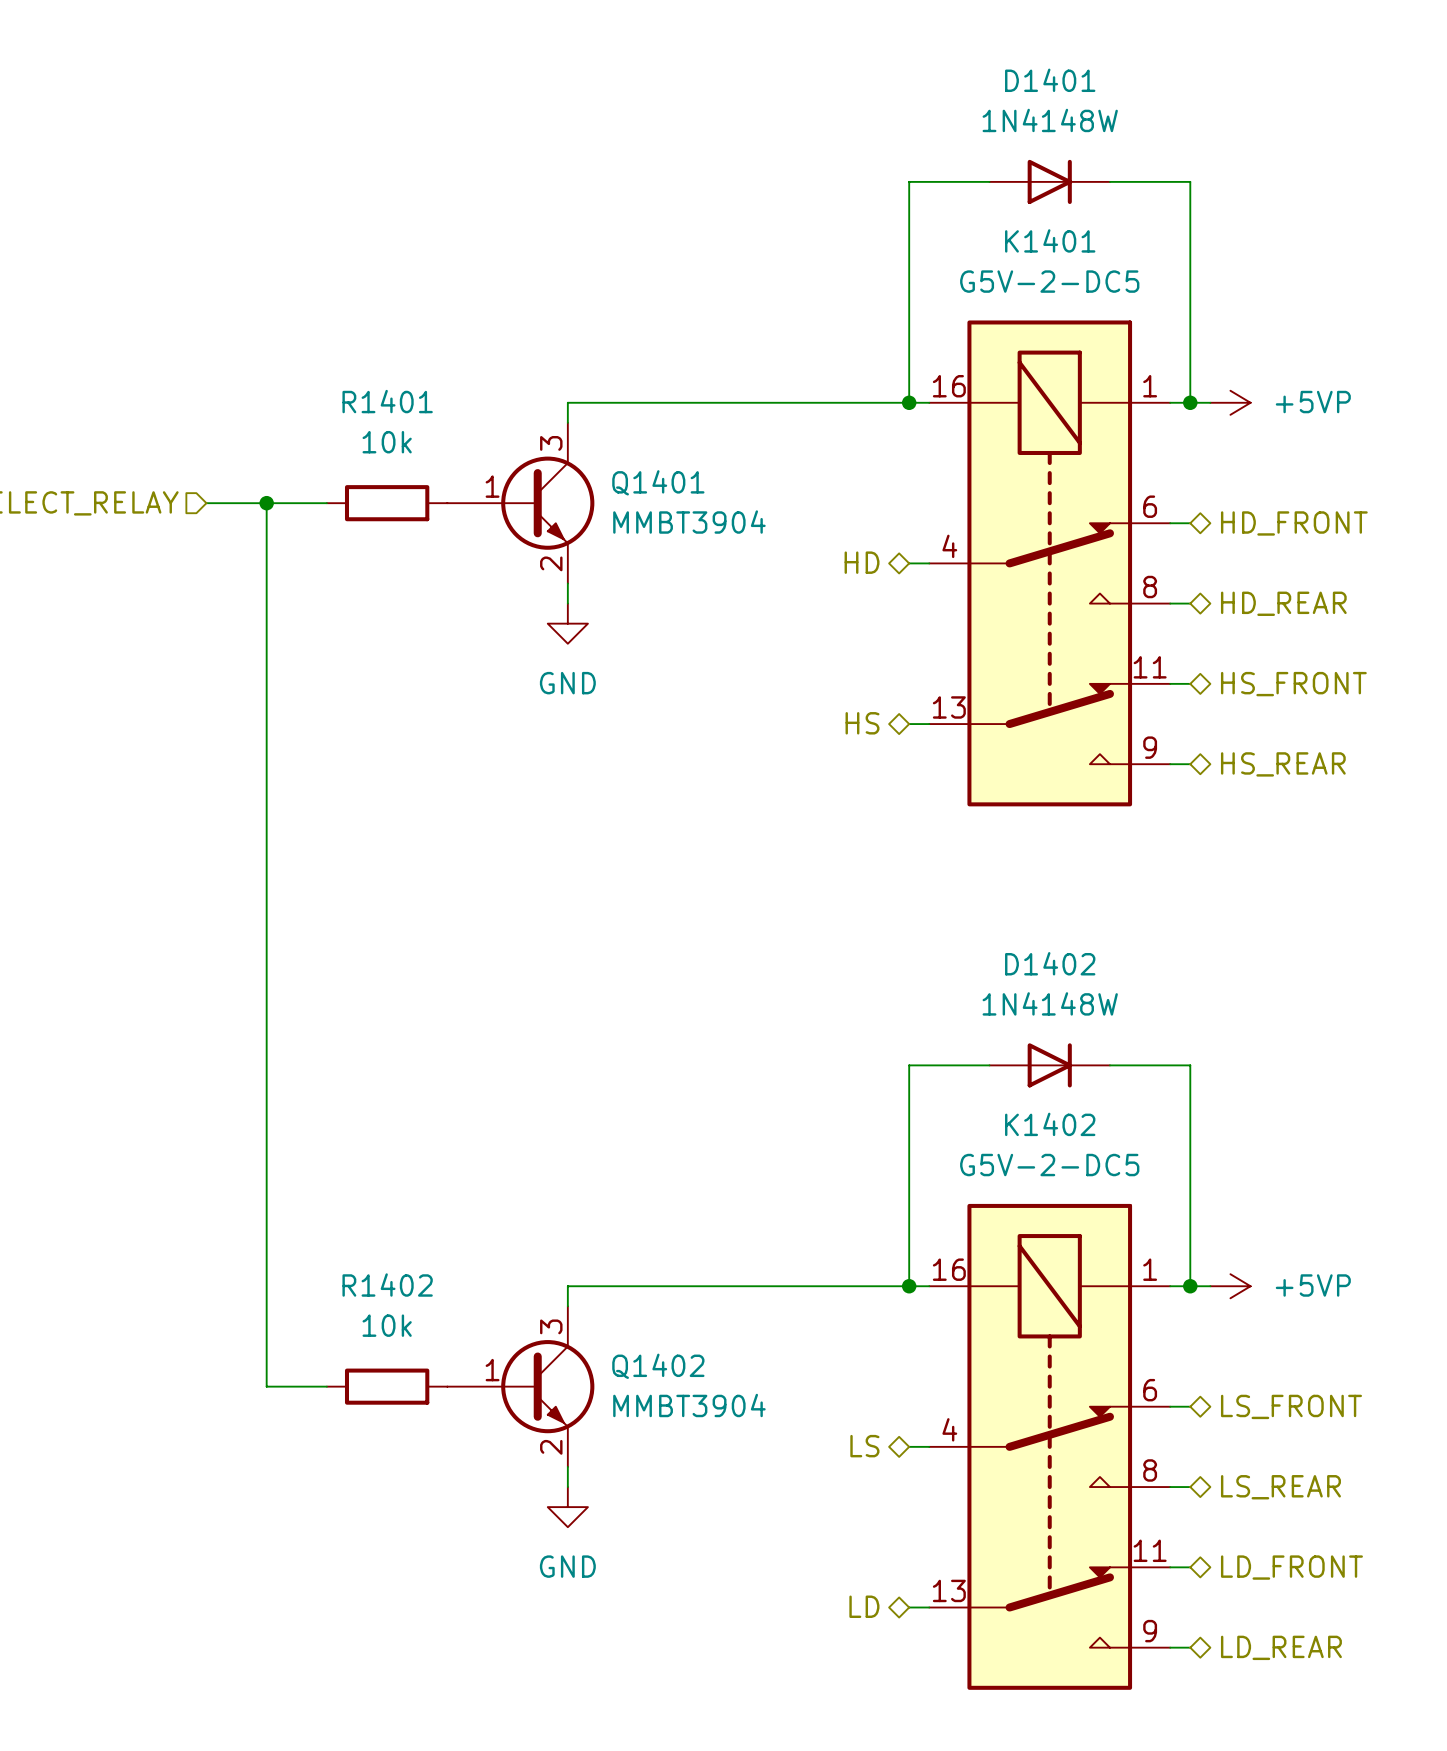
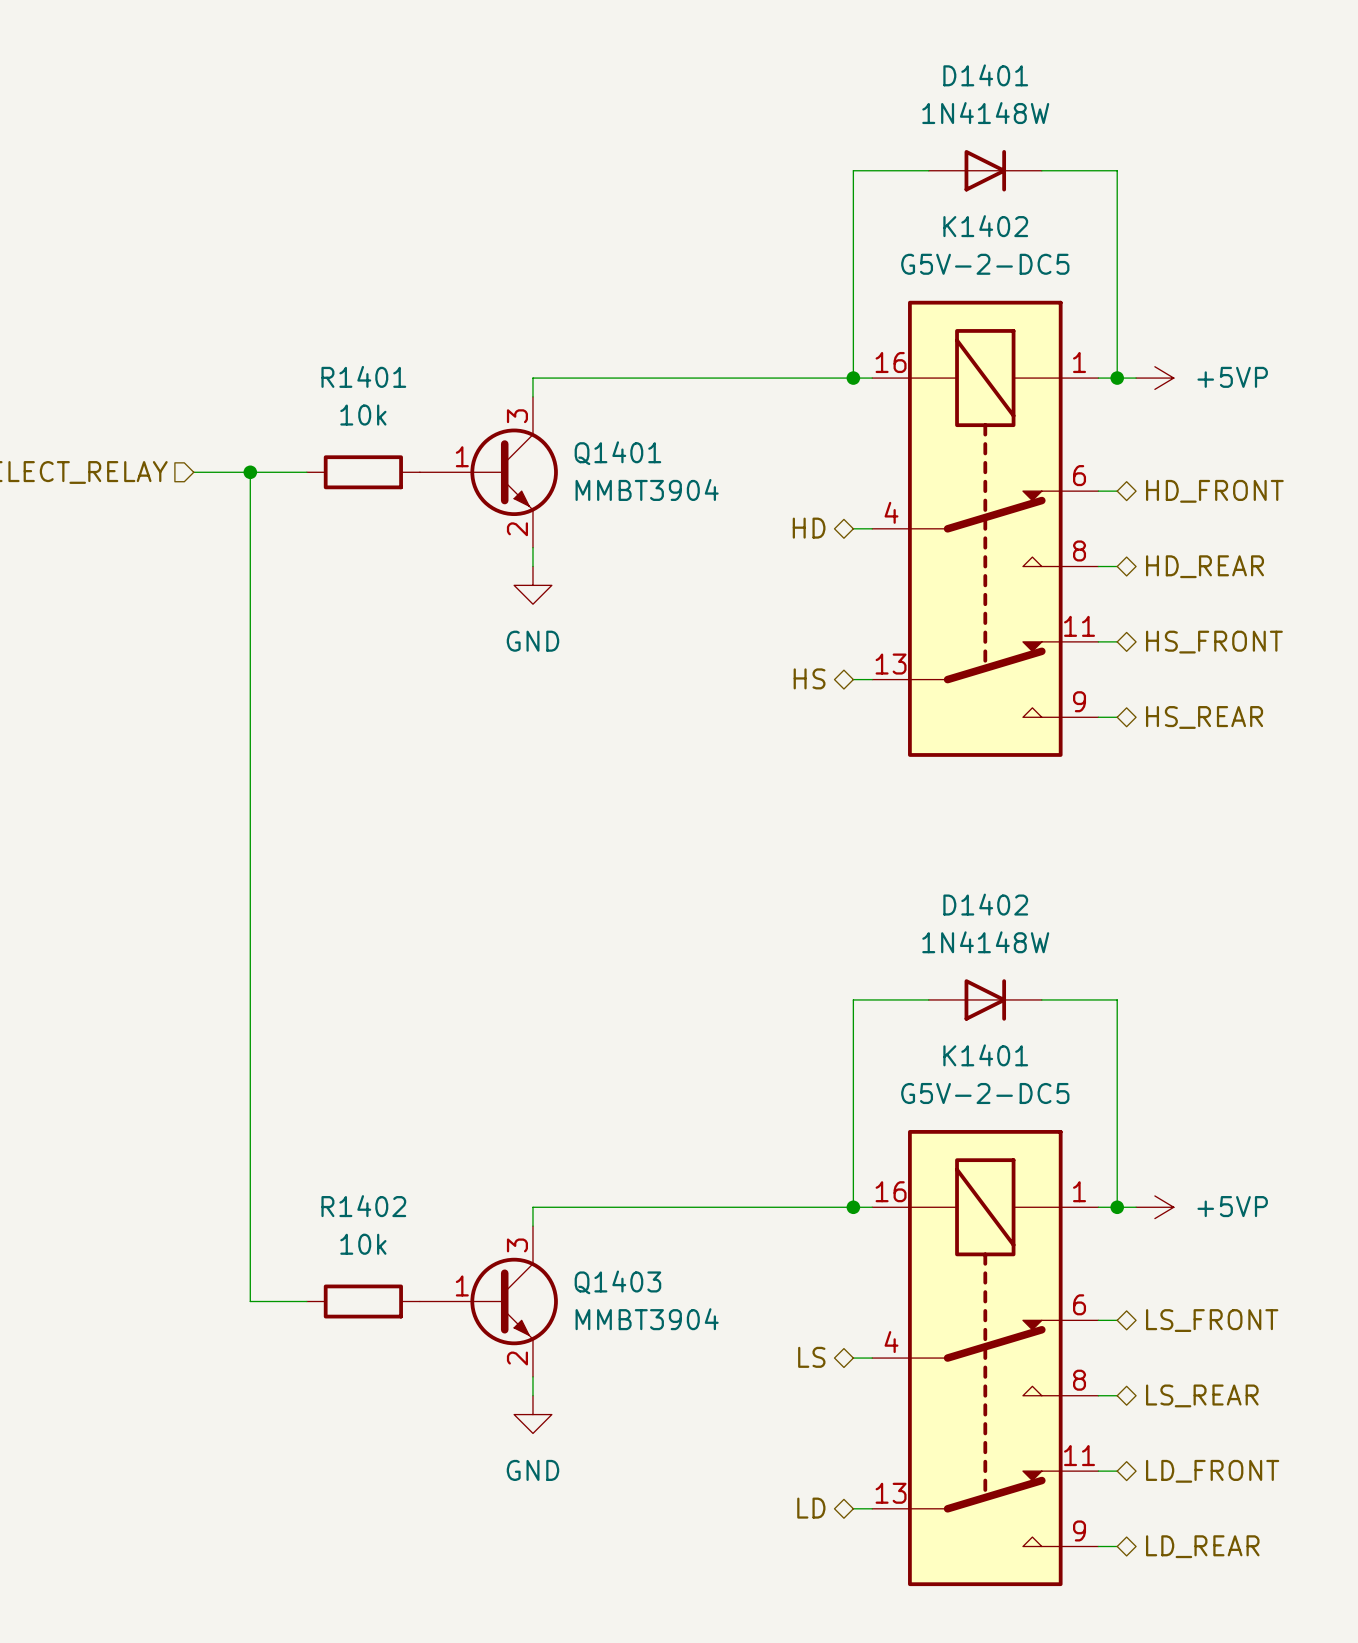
K1401 name: K1401 (1050, 240) -> K1402 (985, 226)
K1402 name: K1402 (1050, 1124) -> K1401 (985, 1055)
Q1402 name: Q1402 (658, 1366) -> Q1403 (617, 1282)

